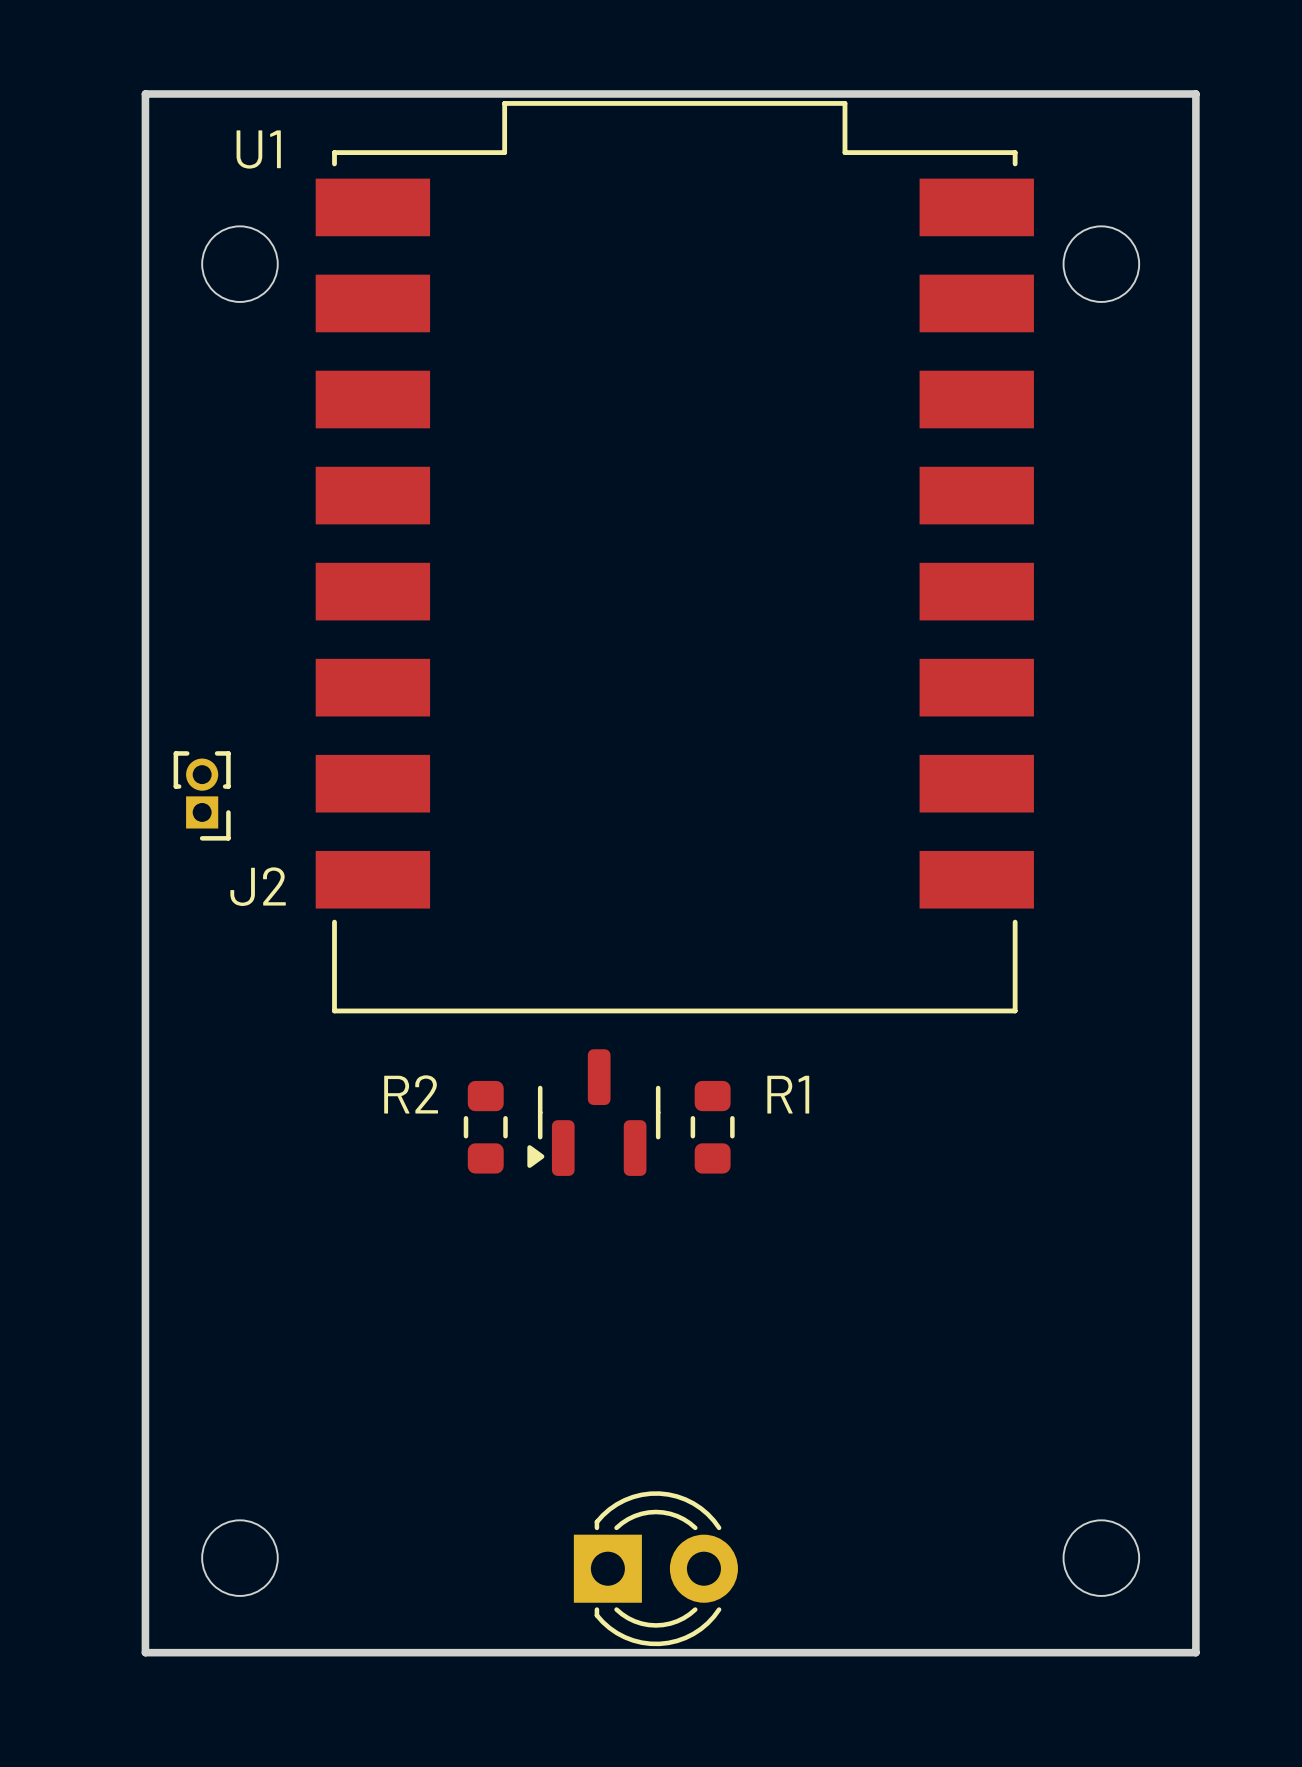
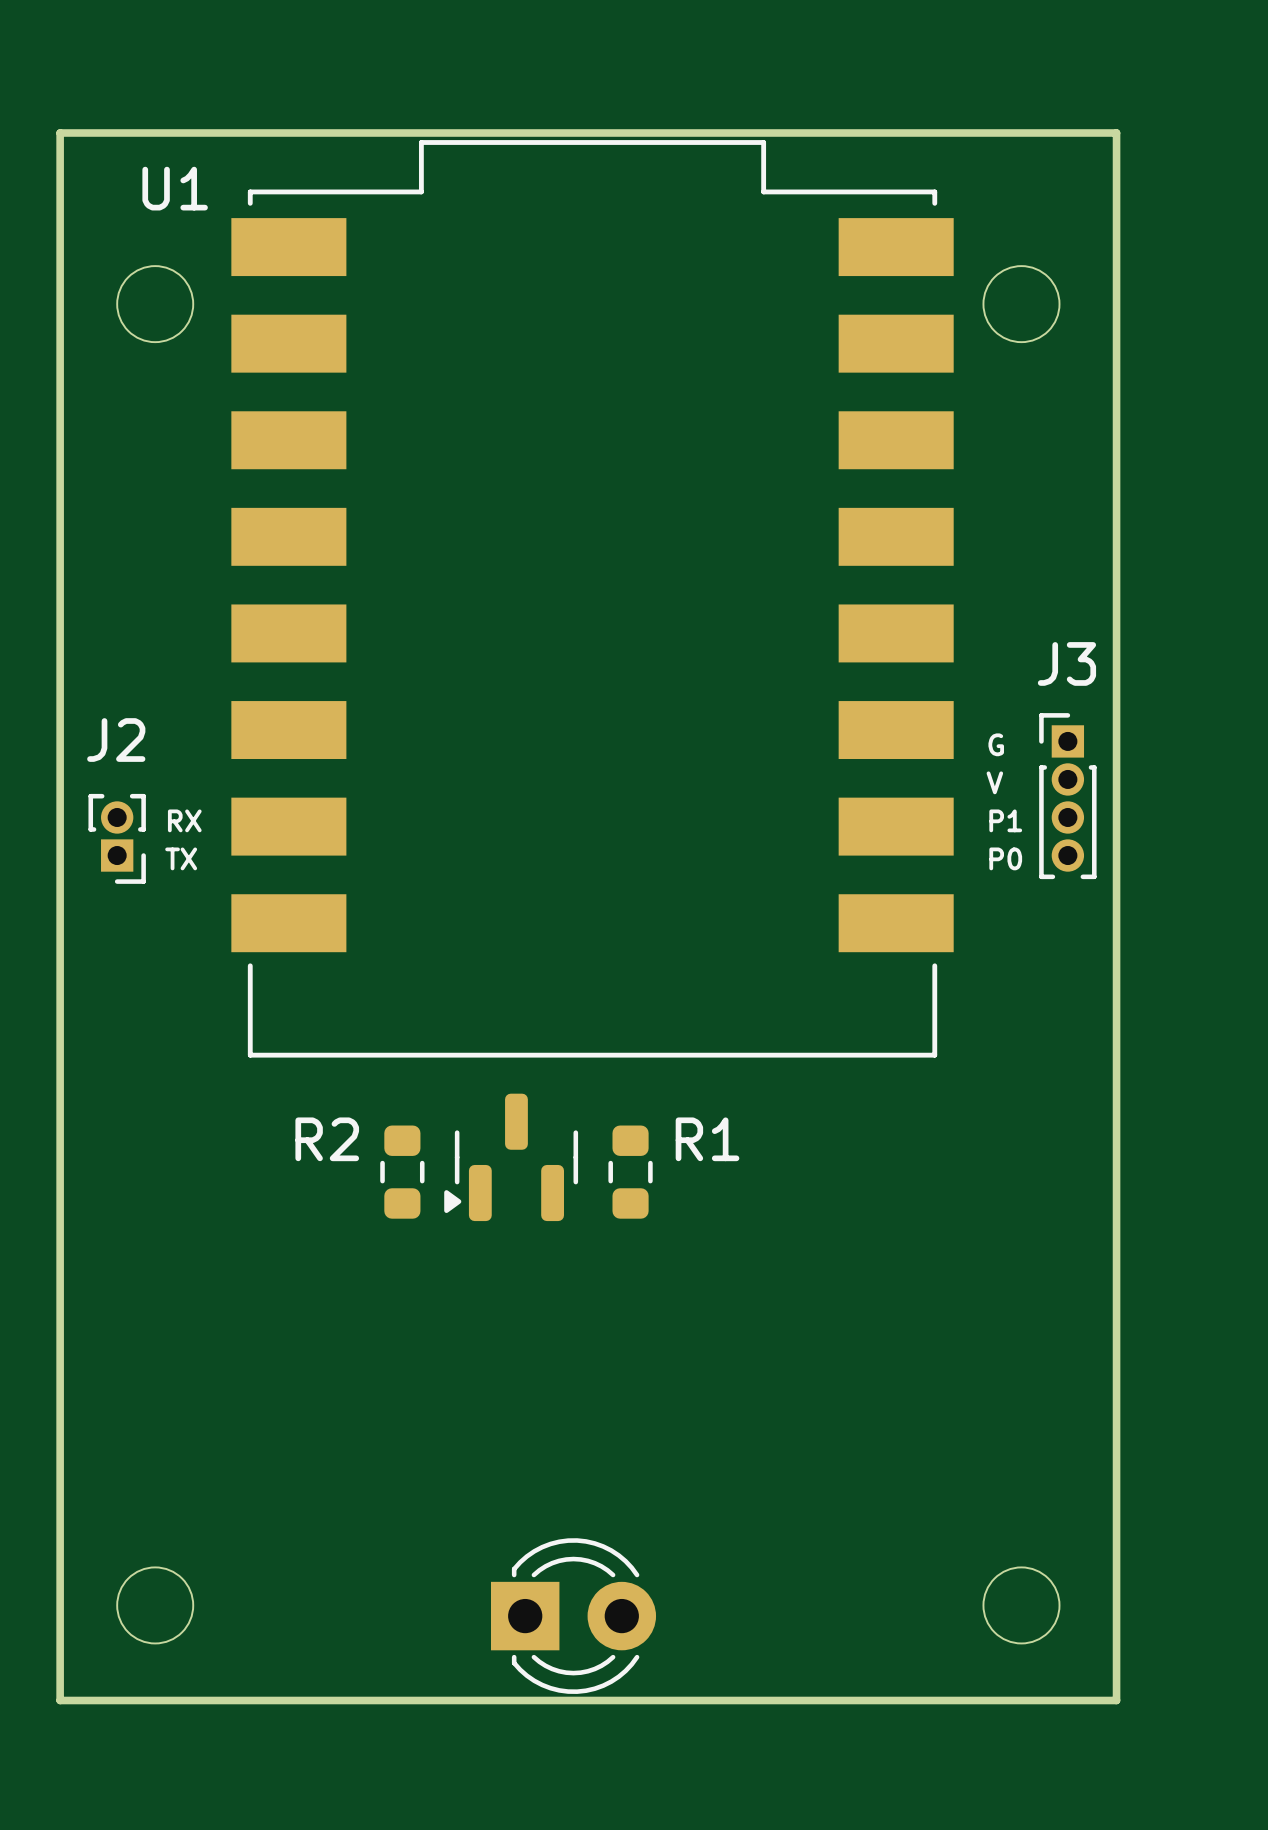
text: none -> G (996, 744)
text: none -> V (994, 782)
J3: none -> (1067, 796)
text: none -> RX (184, 820)
text: none -> P1 (1005, 820)
text: none -> TX (181, 858)
text: none -> P0 (1005, 858)
J2 name position: J2 (258, 886) -> J2 (116, 740)

